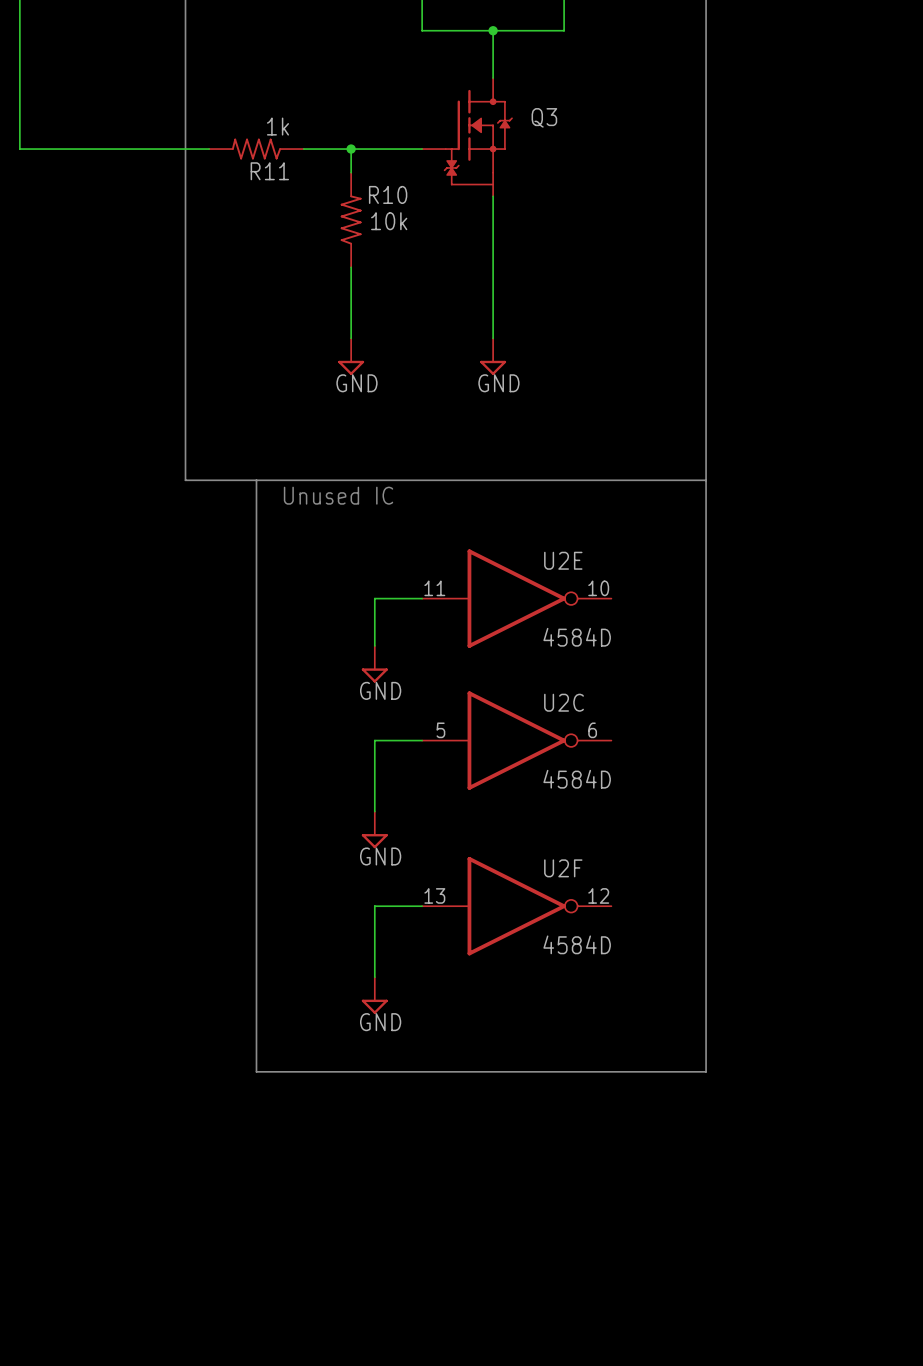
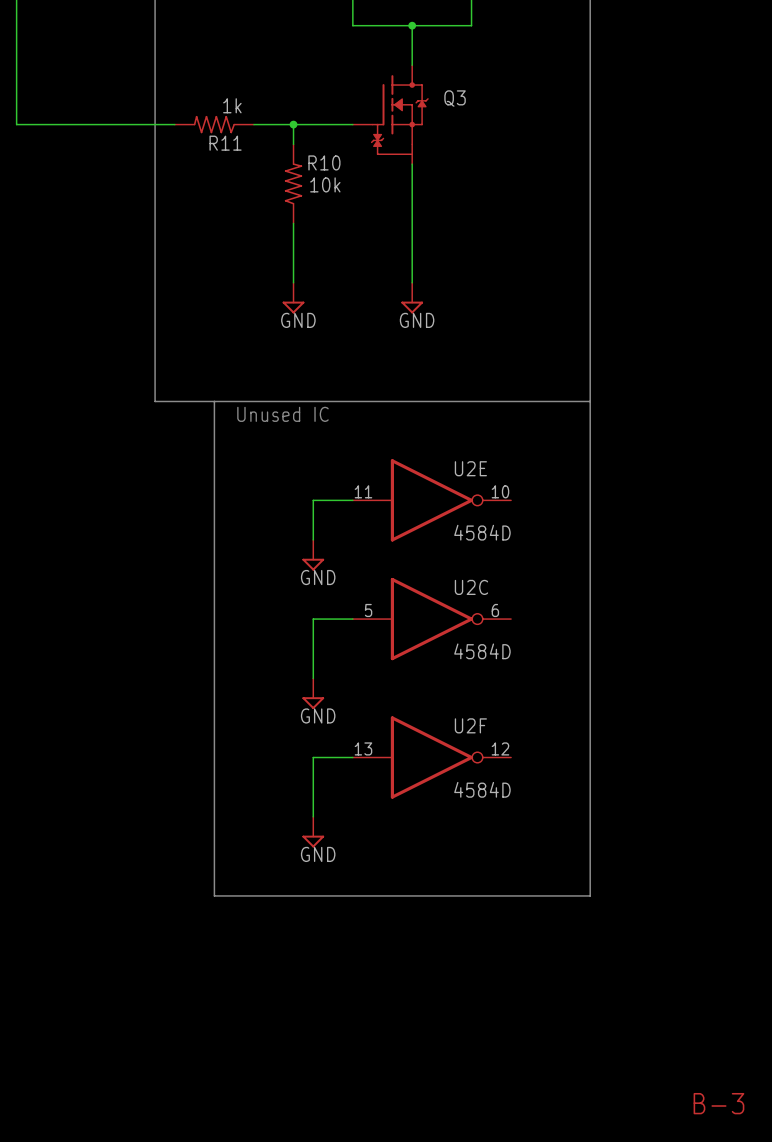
text: none -> B-3 (718, 1103)

